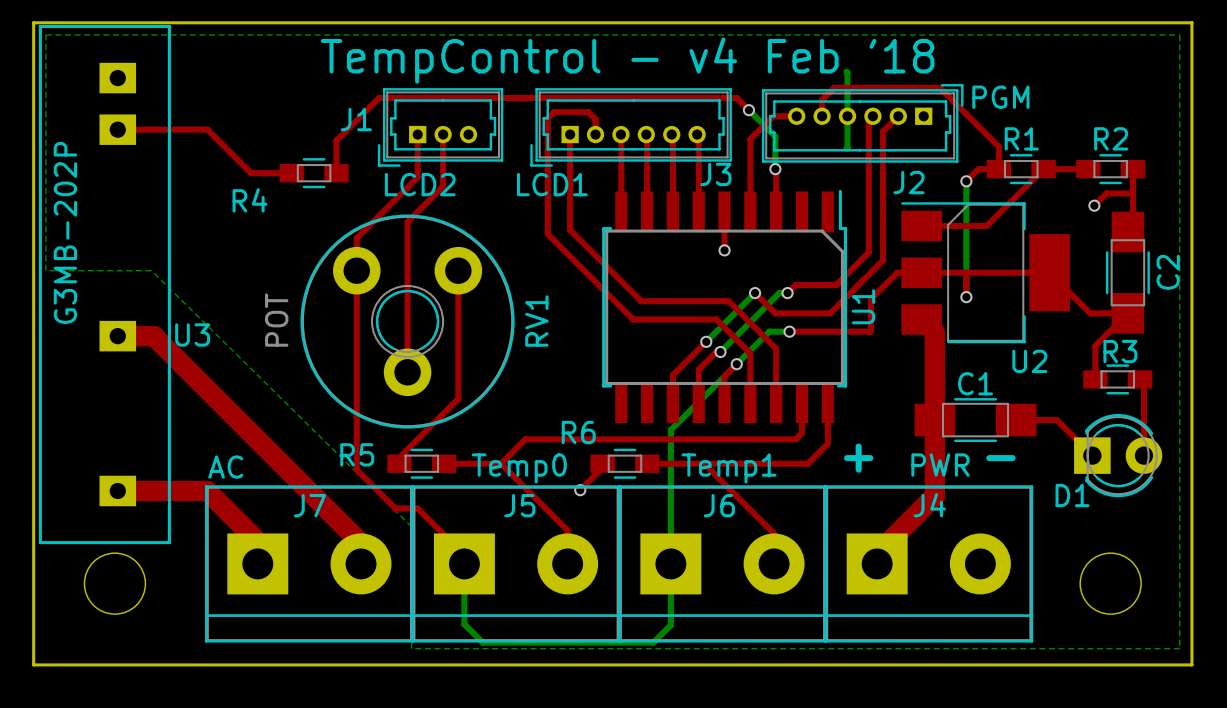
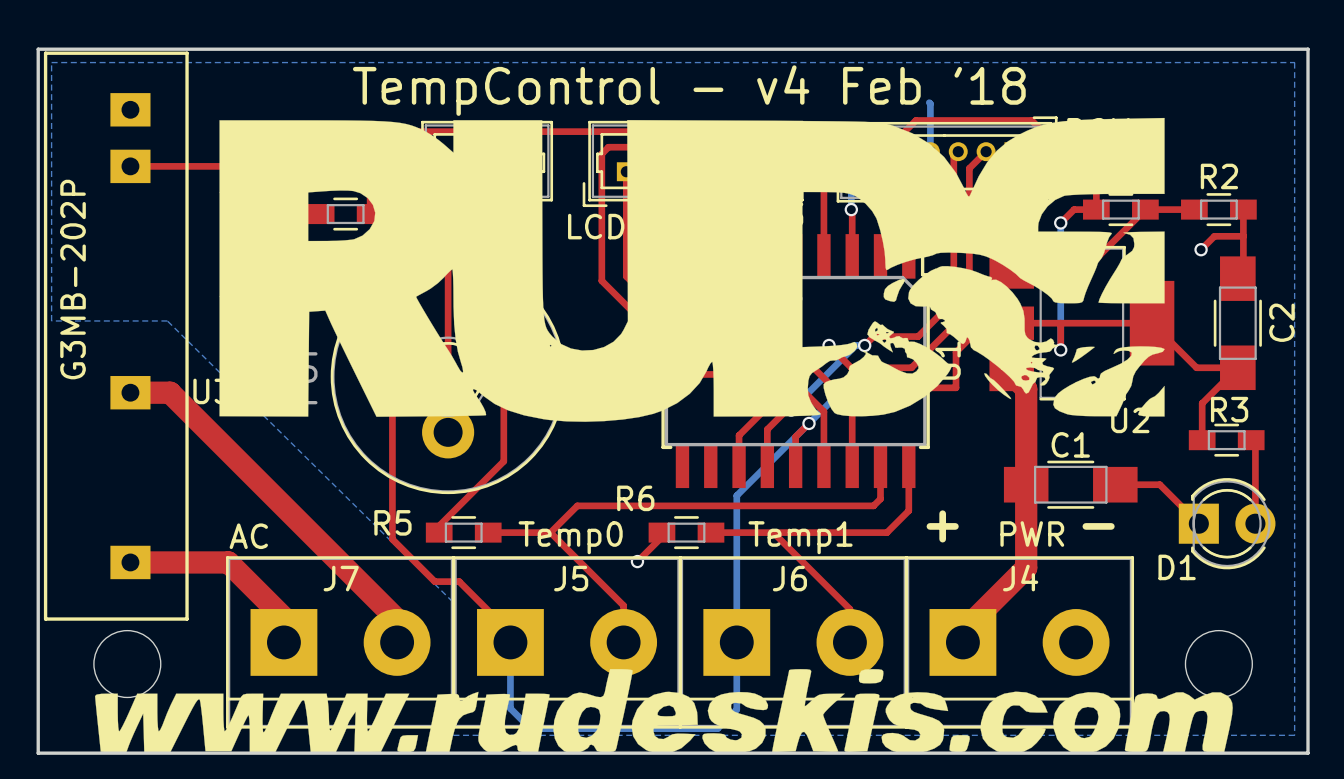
drawing: none -> [95, 117, 1233, 755]

